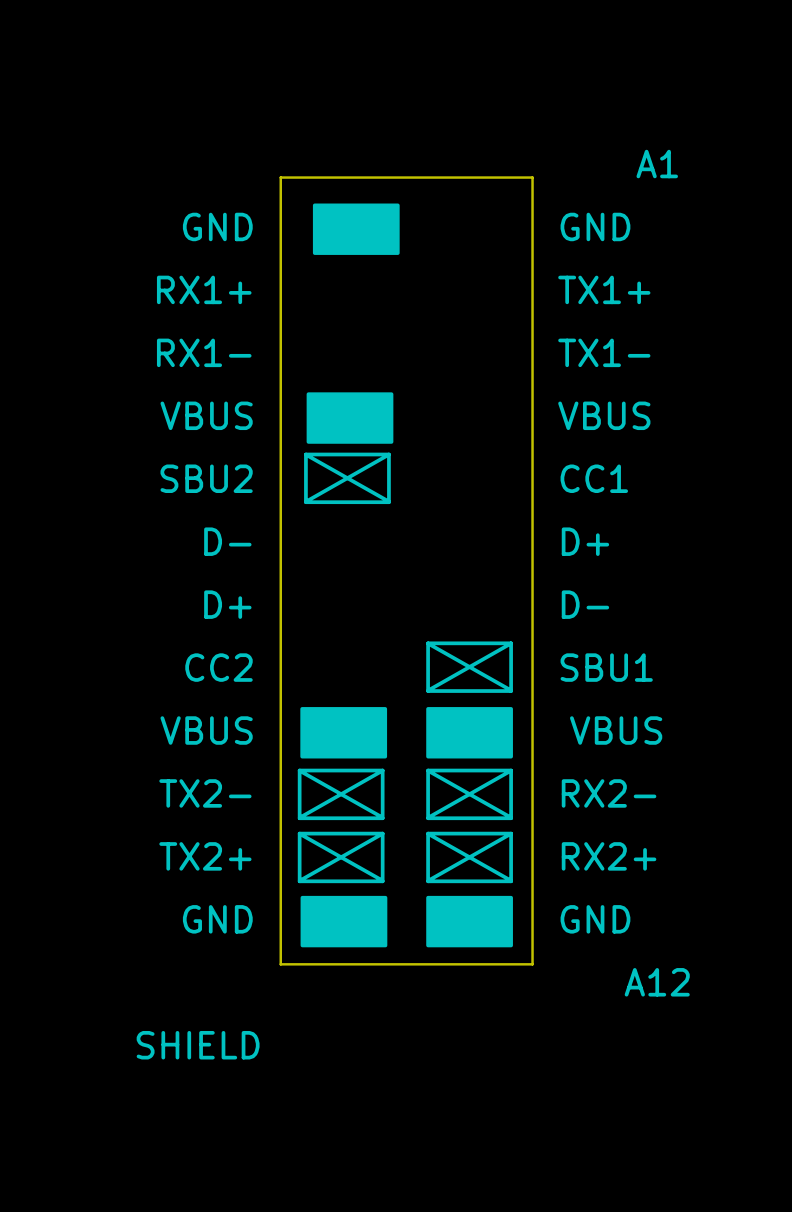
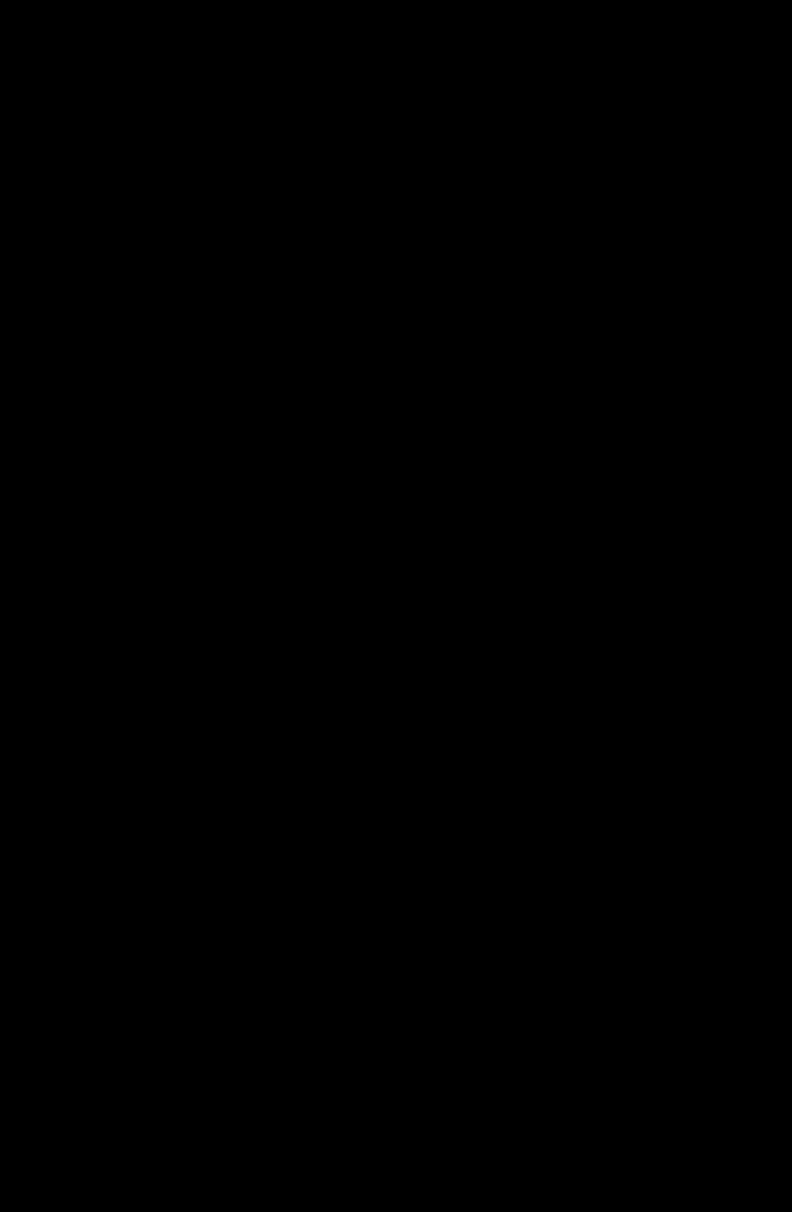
text: A1 (657, 164) -> none
board edge: (280, 177) (532, 177) (532, 964) (280, 964) (280, 177) -> none
drawing: [312, 203, 400, 255] -> none
text: GND (217, 226) -> none
text: GND (595, 226) -> none
text: RX1+ (204, 289) -> none
text: TX1+ (604, 289) -> none
text: RX1- (204, 352) -> none
text: TX1- (604, 352) -> none
drawing: [306, 392, 394, 444] -> none
text: VBUS (206, 415) -> none
text: VBUS (604, 415) -> none
line: (305, 454) (388, 454) (388, 502) (305, 502) (305, 454) -> none
line: (388, 454) (306, 501) -> none
line: (306, 455) (388, 501) -> none
text: SBU2 (206, 478) -> none
text: CC1 (594, 478) -> none
text: D- (227, 541) -> none
text: D+ (585, 541) -> none
text: D+ (227, 604) -> none
text: D- (585, 604) -> none
line: (428, 643) (510, 690) -> none
line: (428, 643) (428, 691) (511, 691) (511, 643) (428, 643) -> none
line: (510, 643) (428, 690) -> none
text: CC2 (218, 667) -> none
text: SBU1 (606, 667) -> none
drawing: [300, 707, 388, 759] -> none
drawing: [426, 707, 513, 759] -> none
text: VBUS (206, 730) -> none
text: VBUS (616, 730) -> none
line: (299, 770) (382, 770) (382, 818) (299, 818) (299, 770) -> none
line: (382, 770) (300, 817) -> none
line: (428, 770) (511, 770) (511, 818) (428, 818) (428, 770) -> none
line: (510, 770) (428, 817) -> none
line: (300, 771) (382, 817) -> none
line: (428, 771) (510, 817) -> none
text: TX2- (205, 793) -> none
text: RX2- (609, 793) -> none
line: (299, 833) (299, 881) (382, 881) (382, 833) (299, 833) -> none
line: (382, 833) (300, 880) -> none
line: (428, 833) (428, 881) (511, 881) (511, 833) (428, 833) -> none
line: (510, 833) (428, 880) -> none
line: (300, 834) (382, 880) -> none
line: (428, 834) (510, 880) -> none
text: TX2+ (205, 856) -> none
text: RX2+ (609, 856) -> none
drawing: [300, 895, 388, 948] -> none
drawing: [426, 895, 513, 948] -> none
text: GND (217, 919) -> none
text: GND (595, 919) -> none
text: A12 (657, 982) -> none
text: SHIELD (198, 1045) -> none

